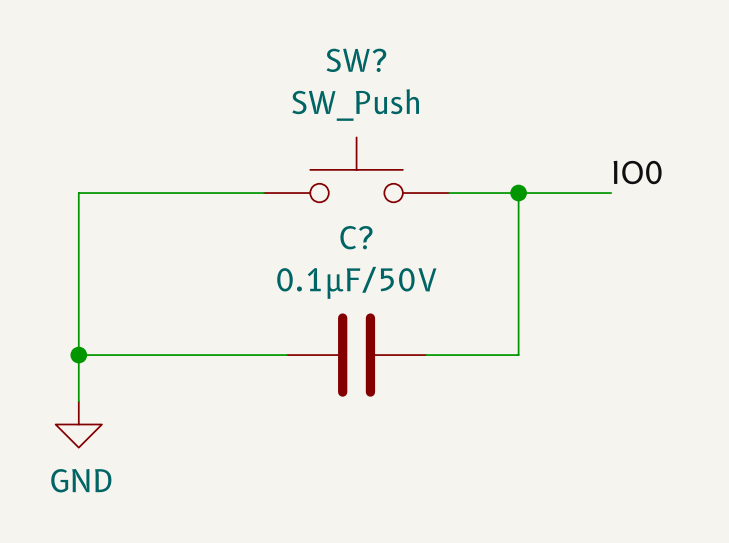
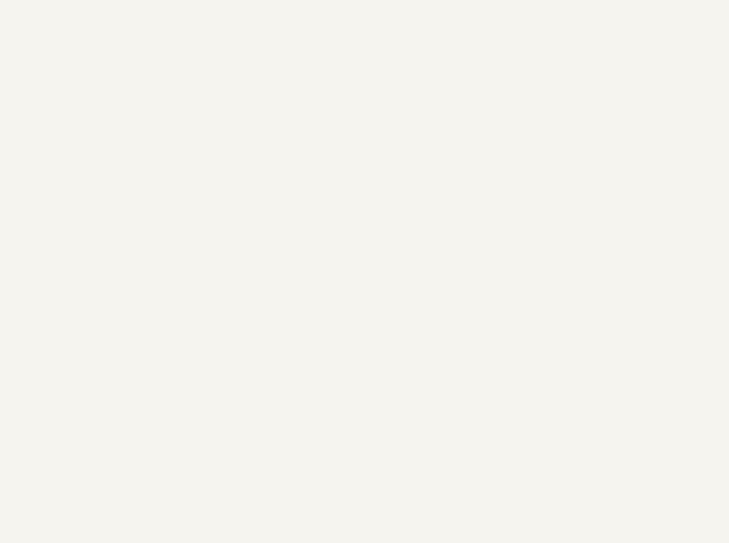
SW?: SW_Push (356, 169) -> none
label: IO0 (637, 172) -> none
wire: (263, 193) (78, 193) (78, 401) -> none
wire: (449, 193) (611, 193) -> none
wire: (518, 193) (518, 355) (426, 355) -> none
junction: (518, 193) -> none
wire: (78, 355) (287, 355) -> none
junction: (78, 355) -> none
C?: 0.1µF/50V (356, 355) -> none
power symbol: GND (78, 424) -> none

